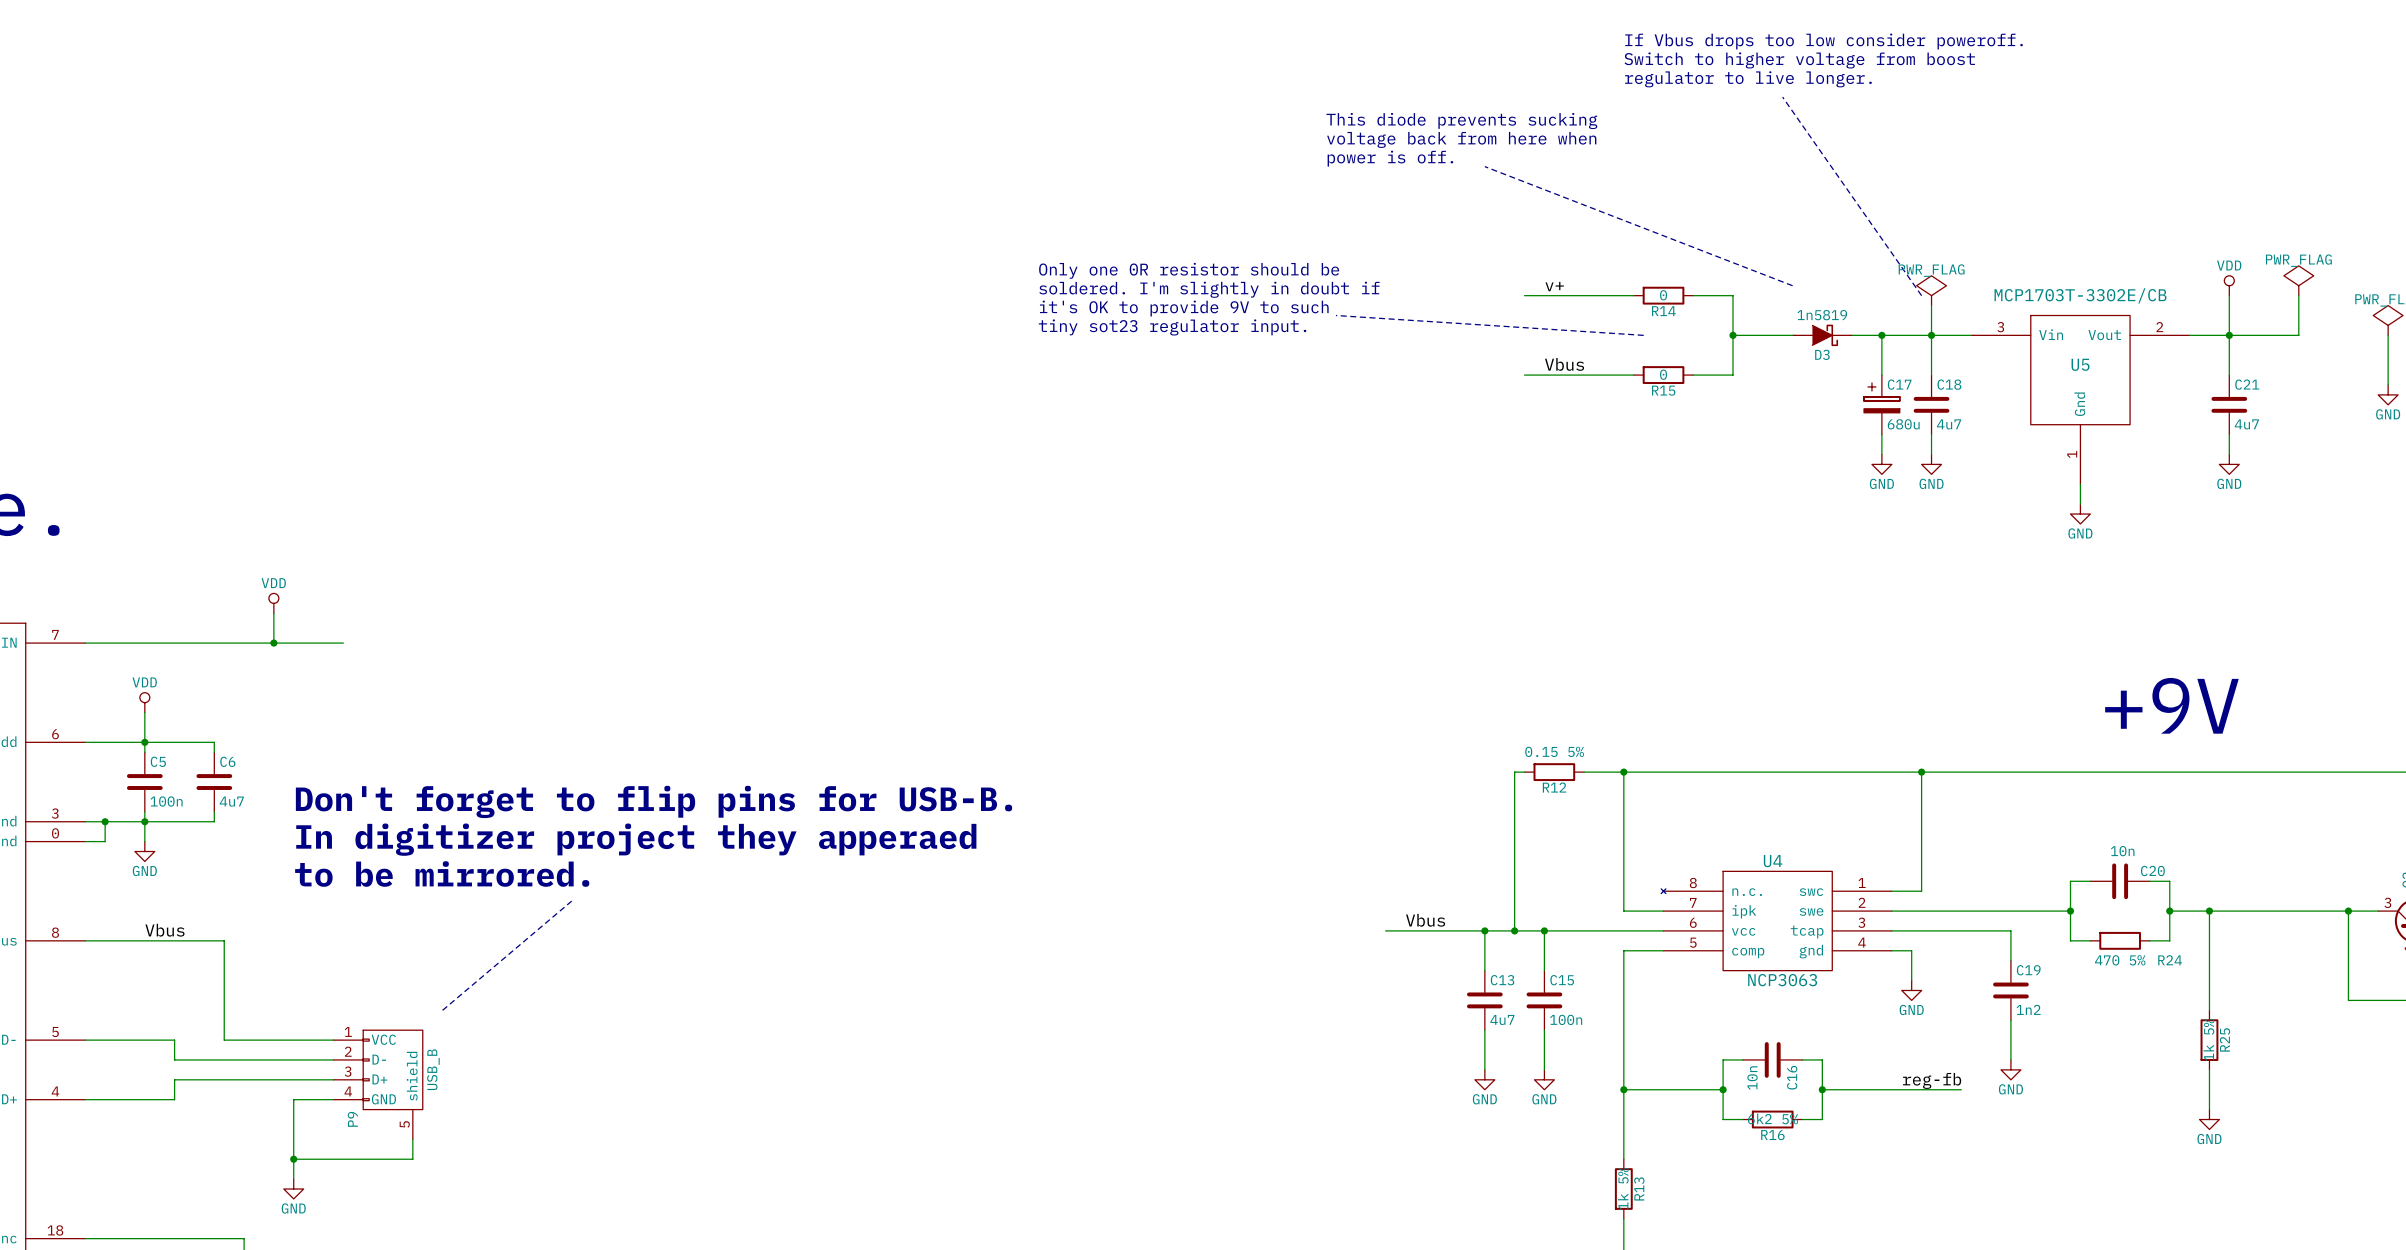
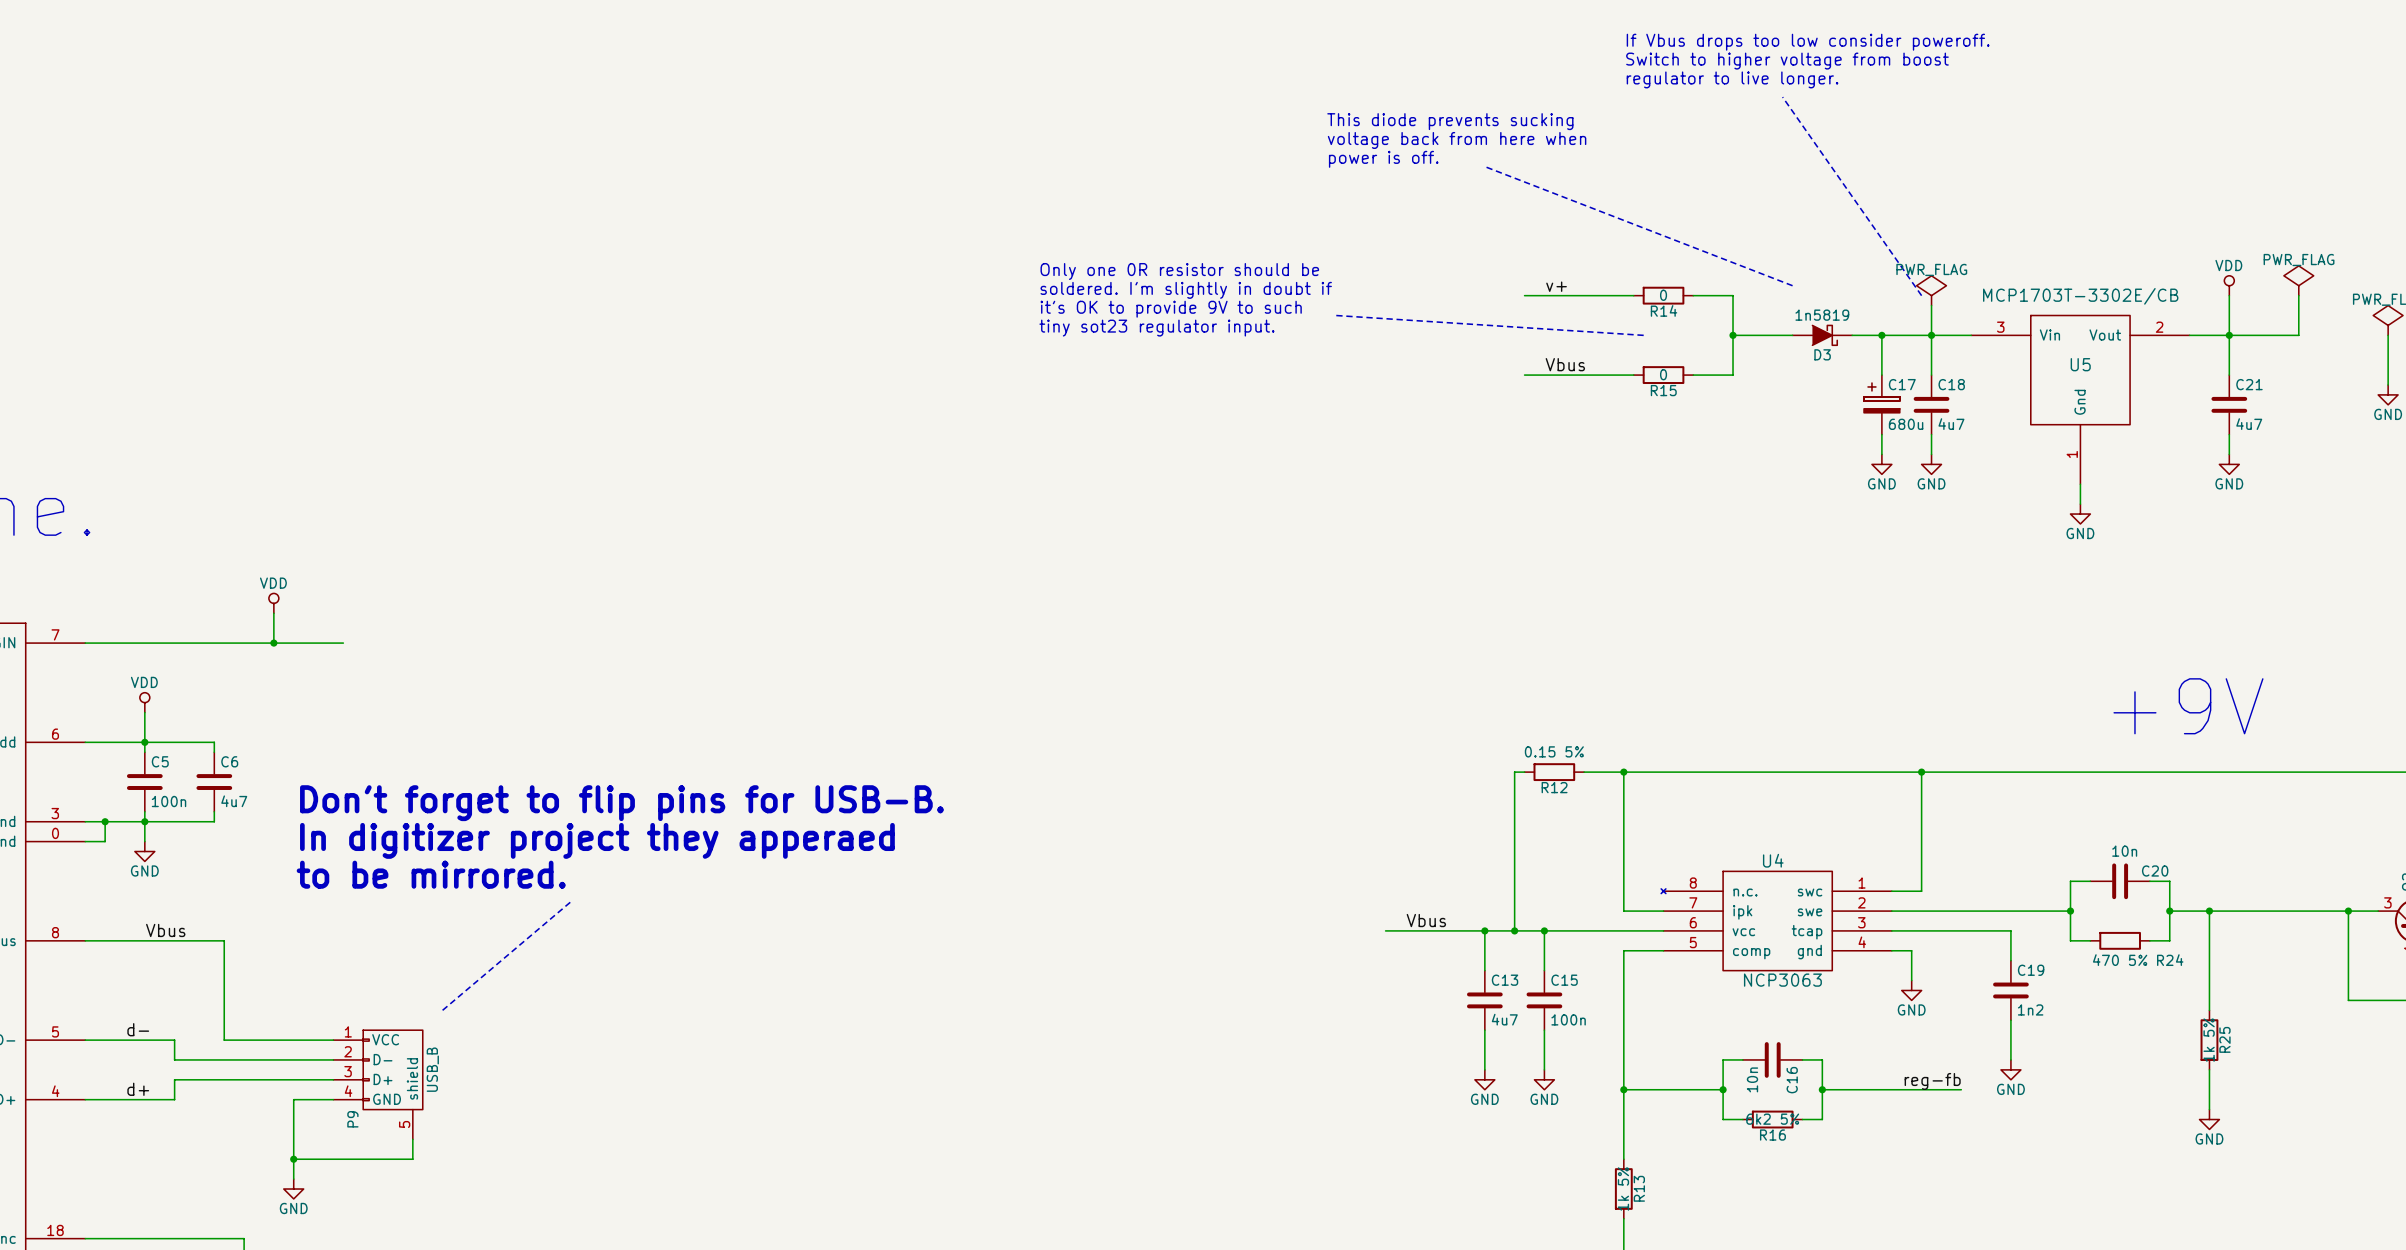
label: none -> d- (138, 1029)
label: none -> d+ (138, 1089)

